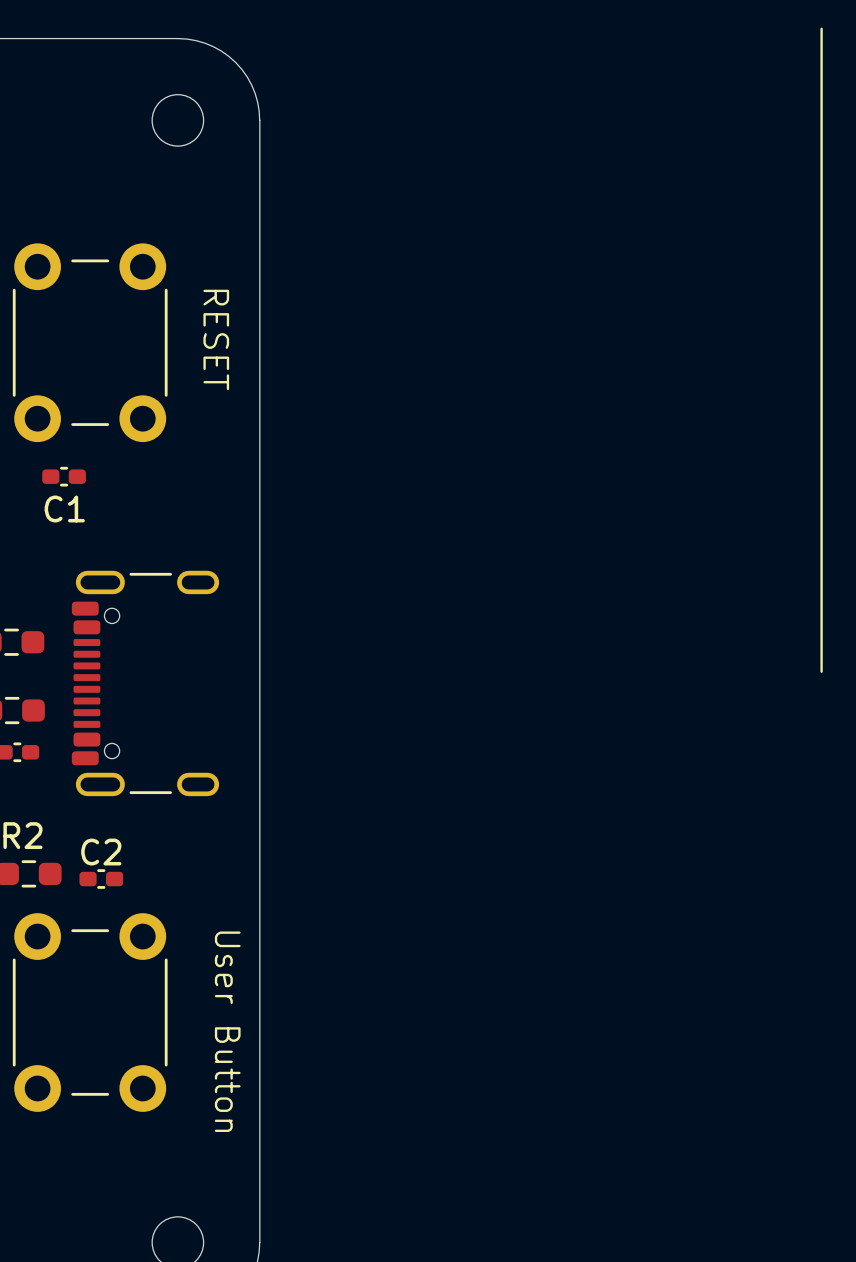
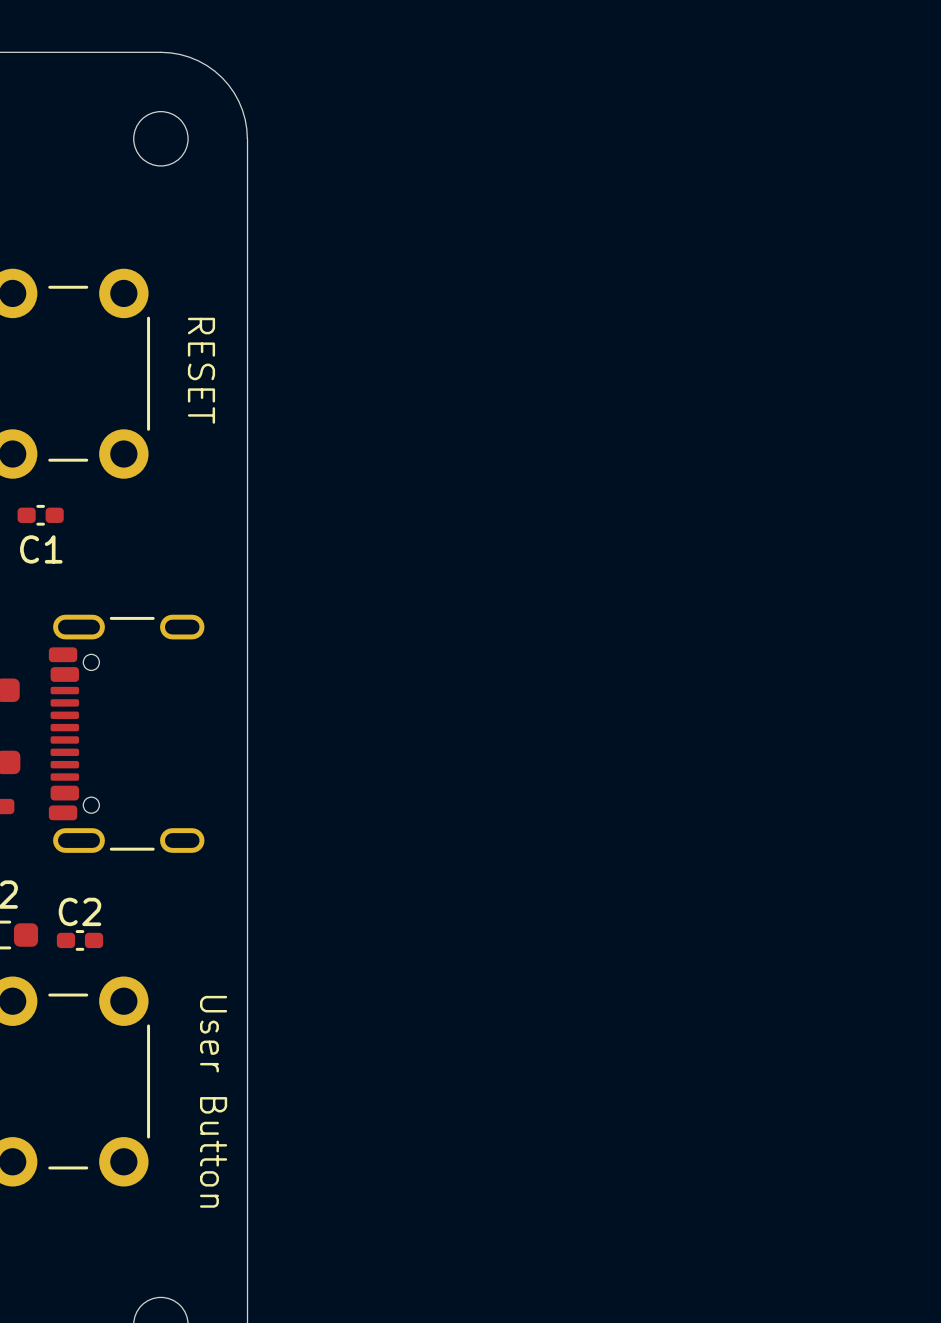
line: (821, 28) (821, 671) -> none

